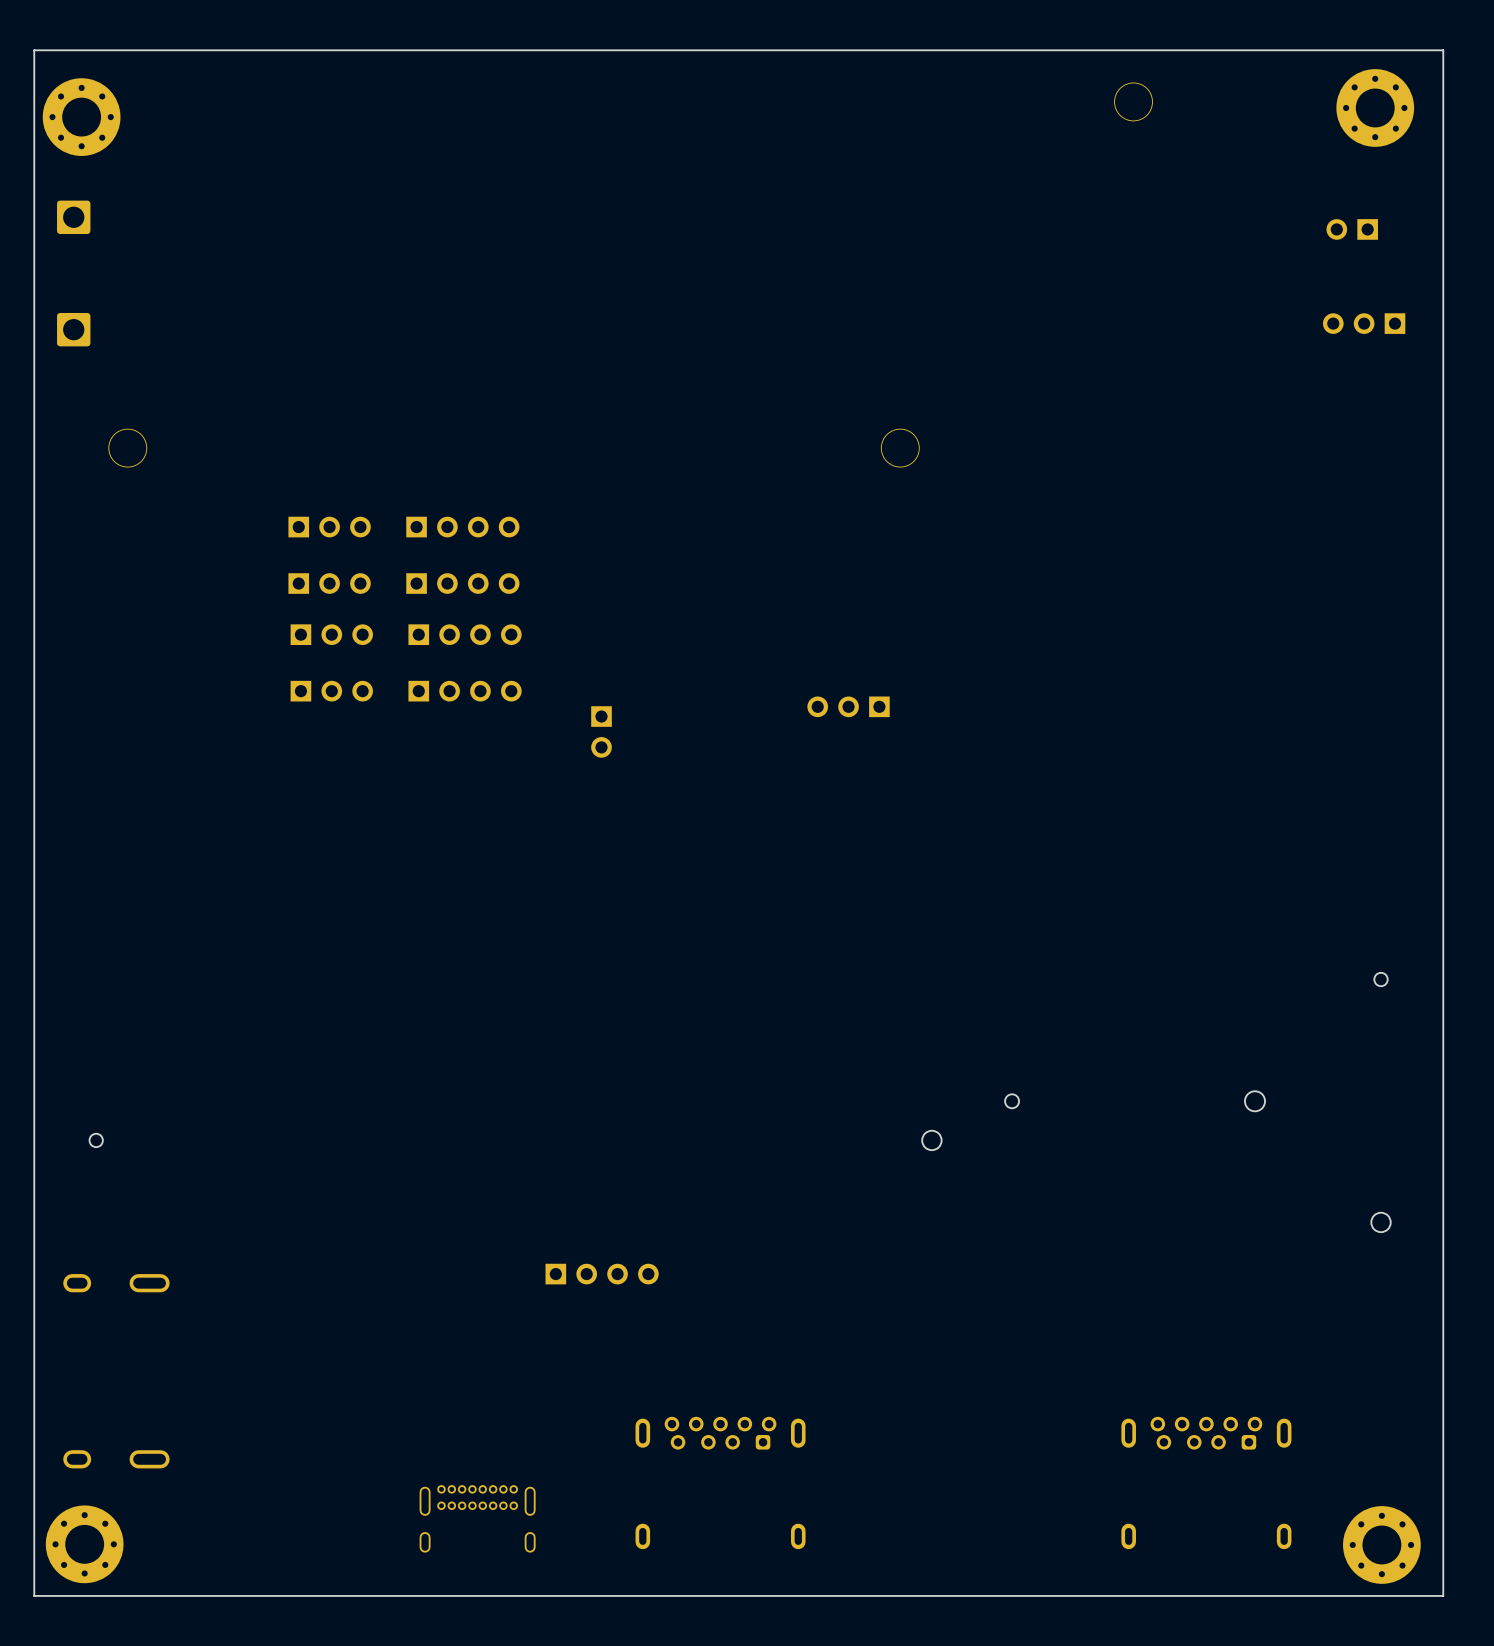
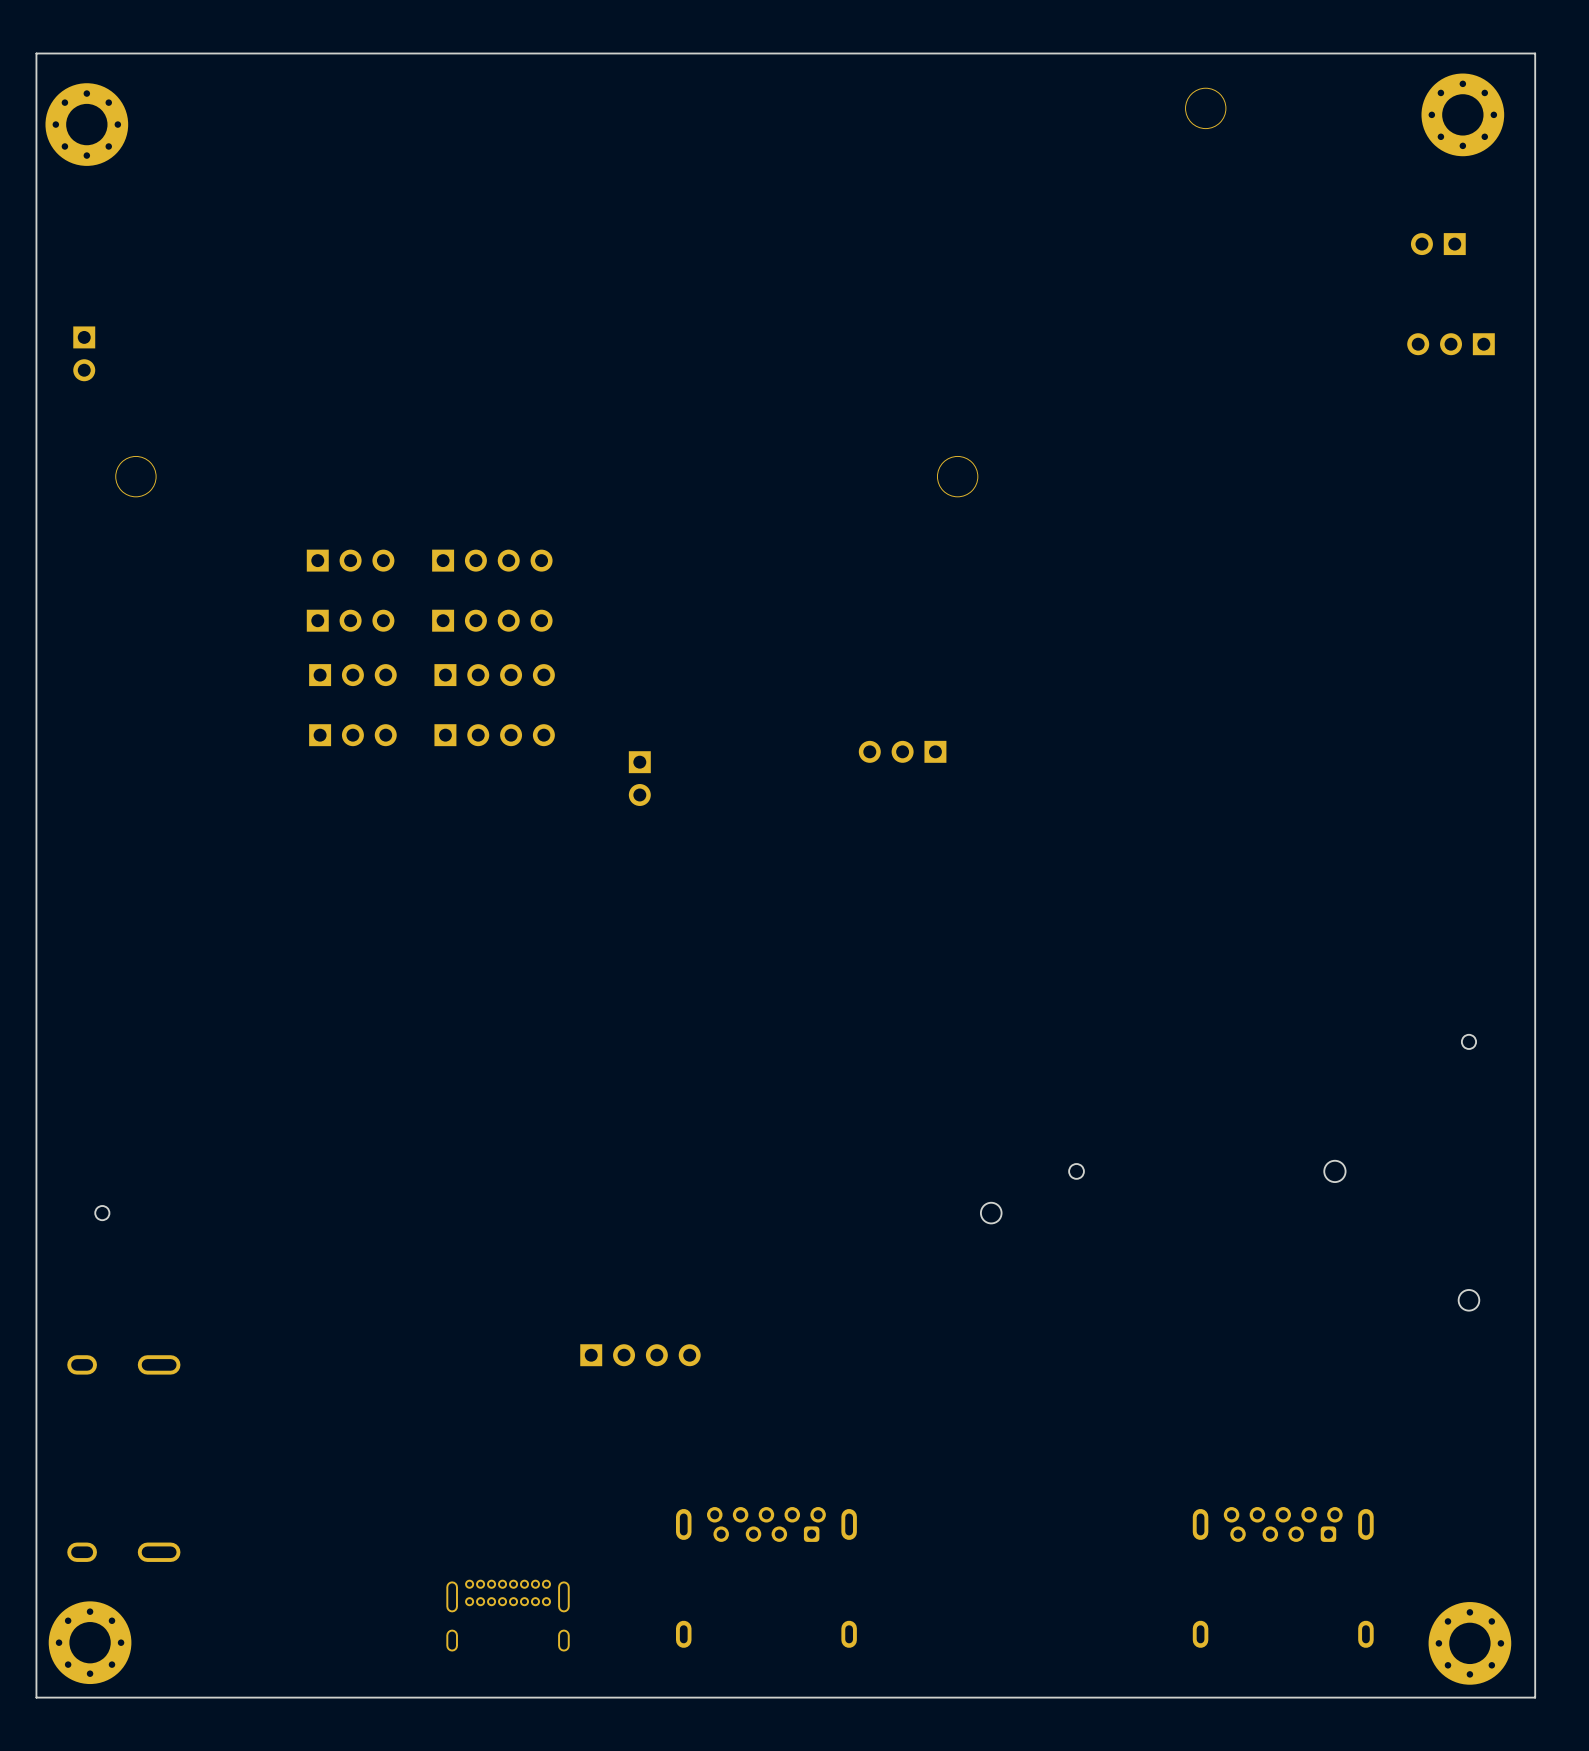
part: (73, 217) -> none
part footprint: [57, 312, 91, 347] -> [73, 326, 96, 382]

